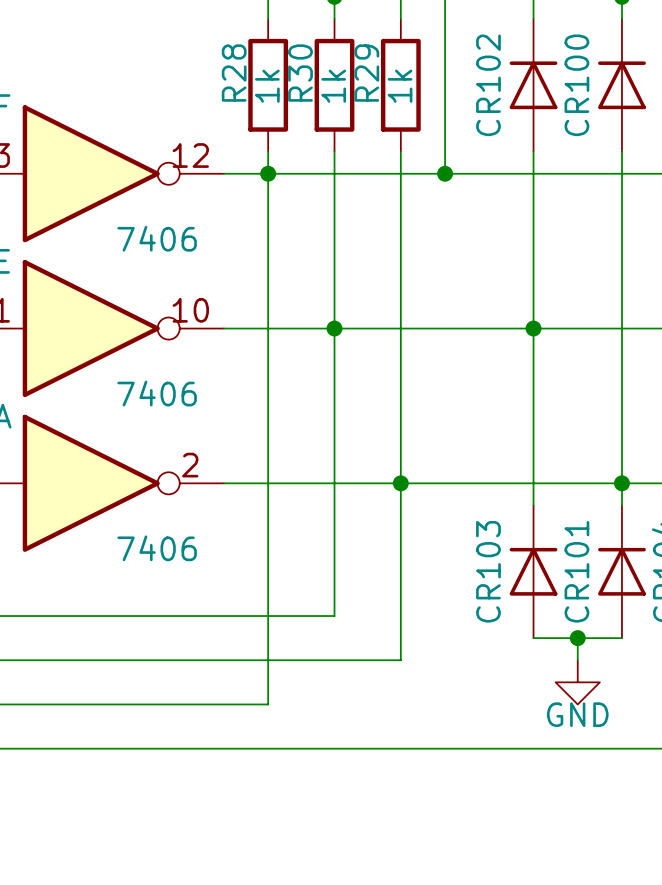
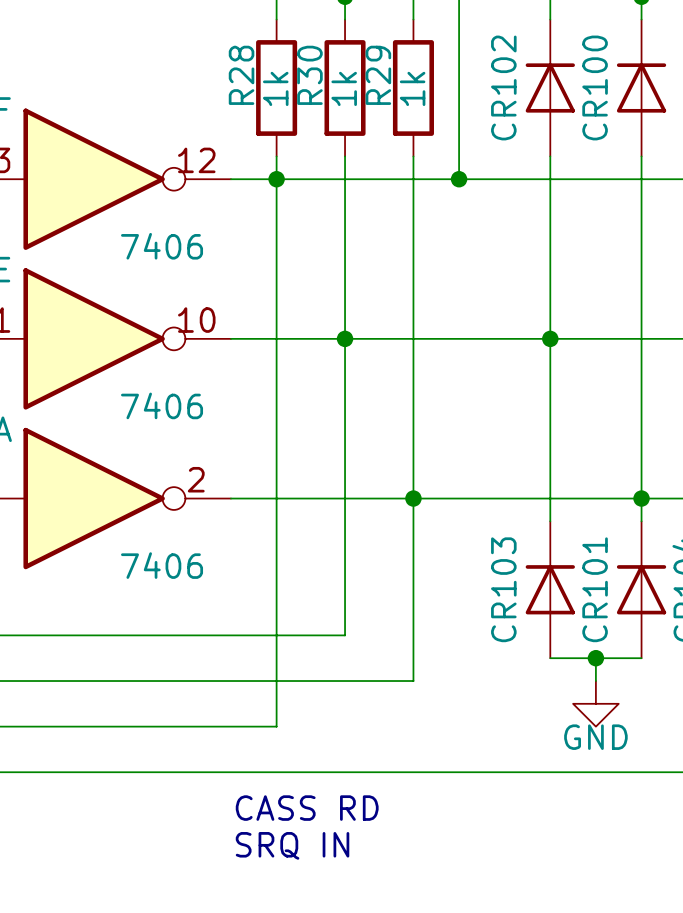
text: none -> CASS RD (307, 808)
text: none -> SRQ IN (292, 845)

